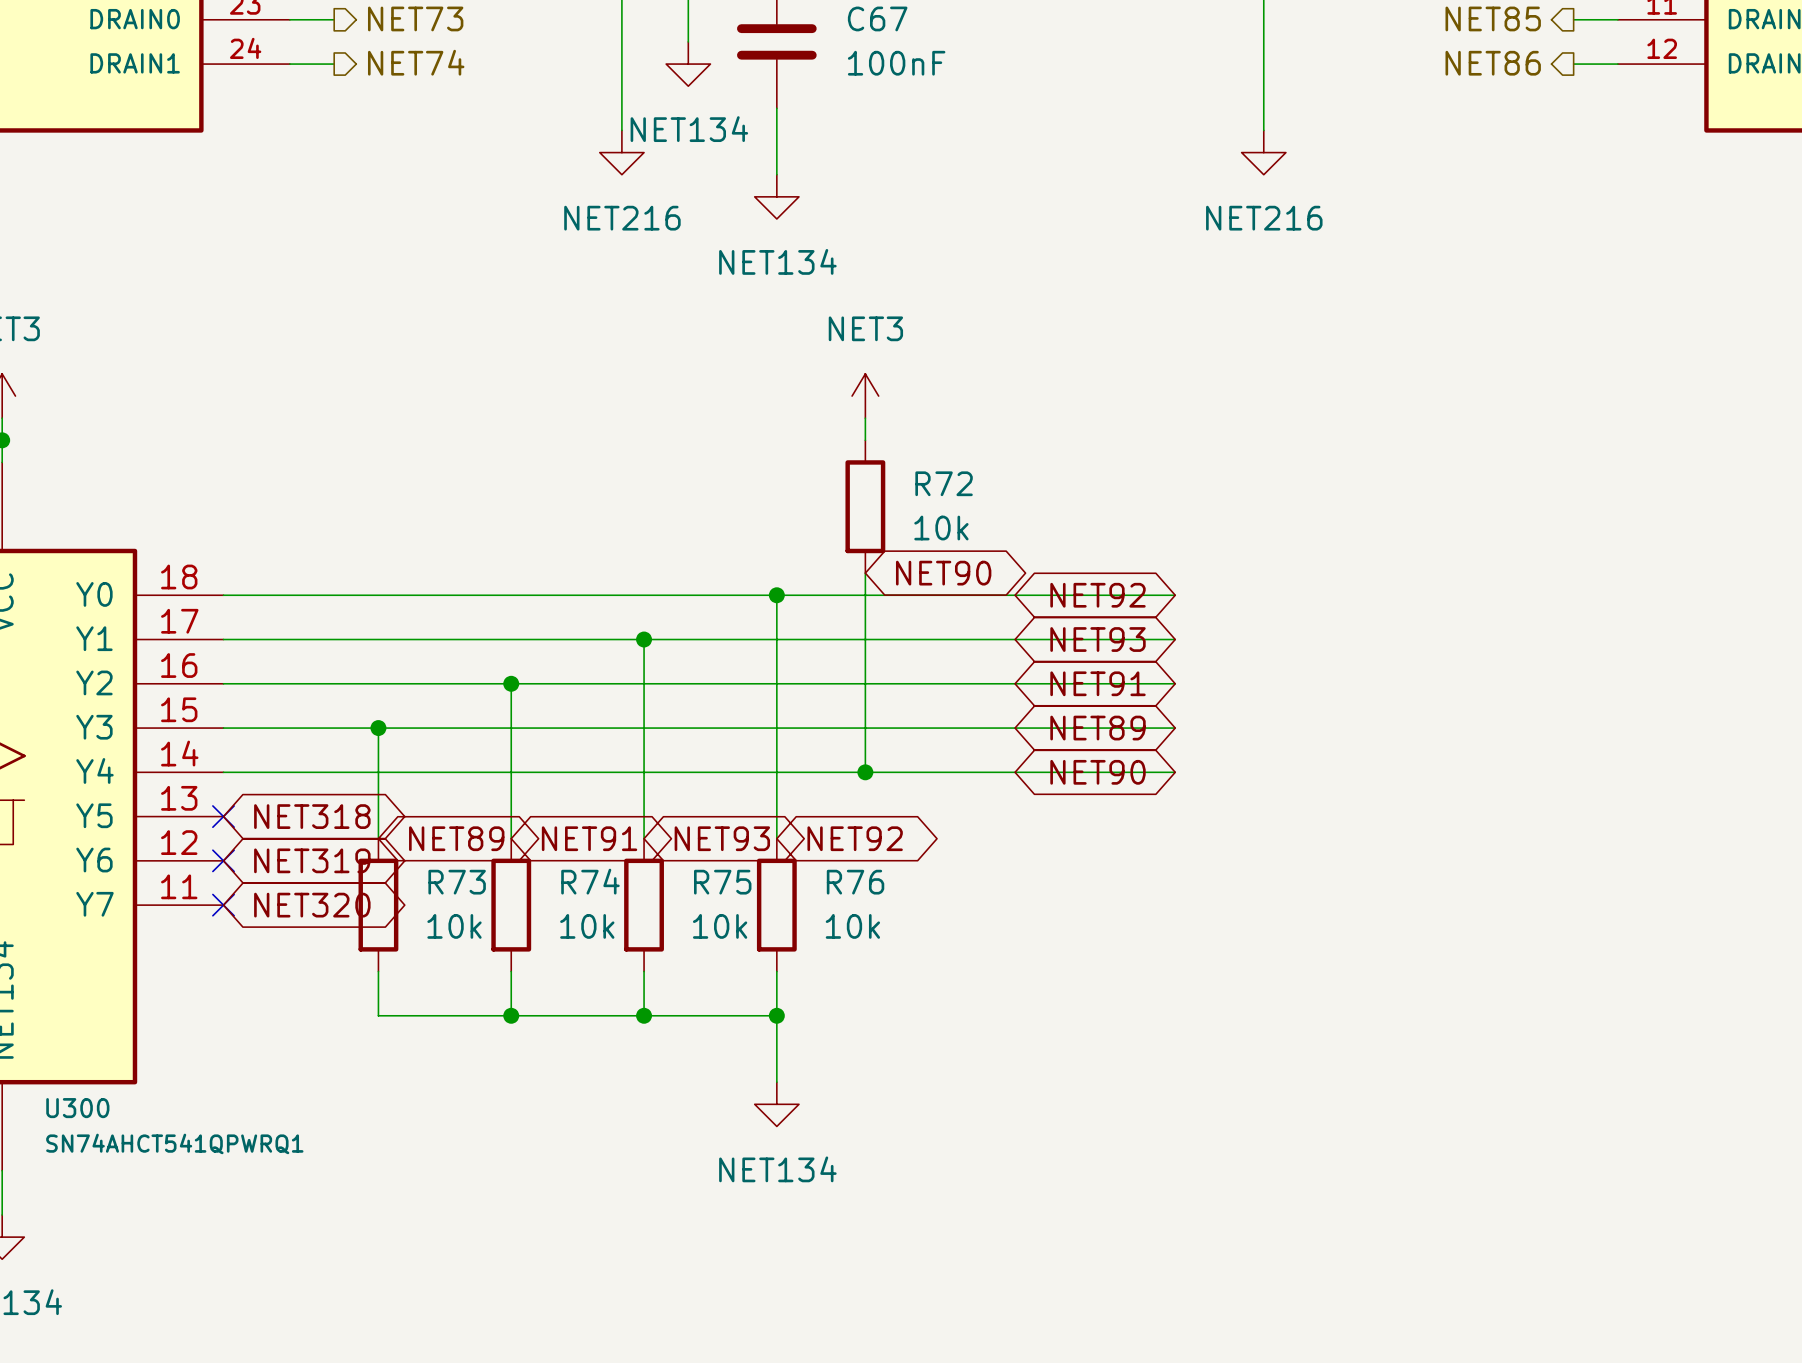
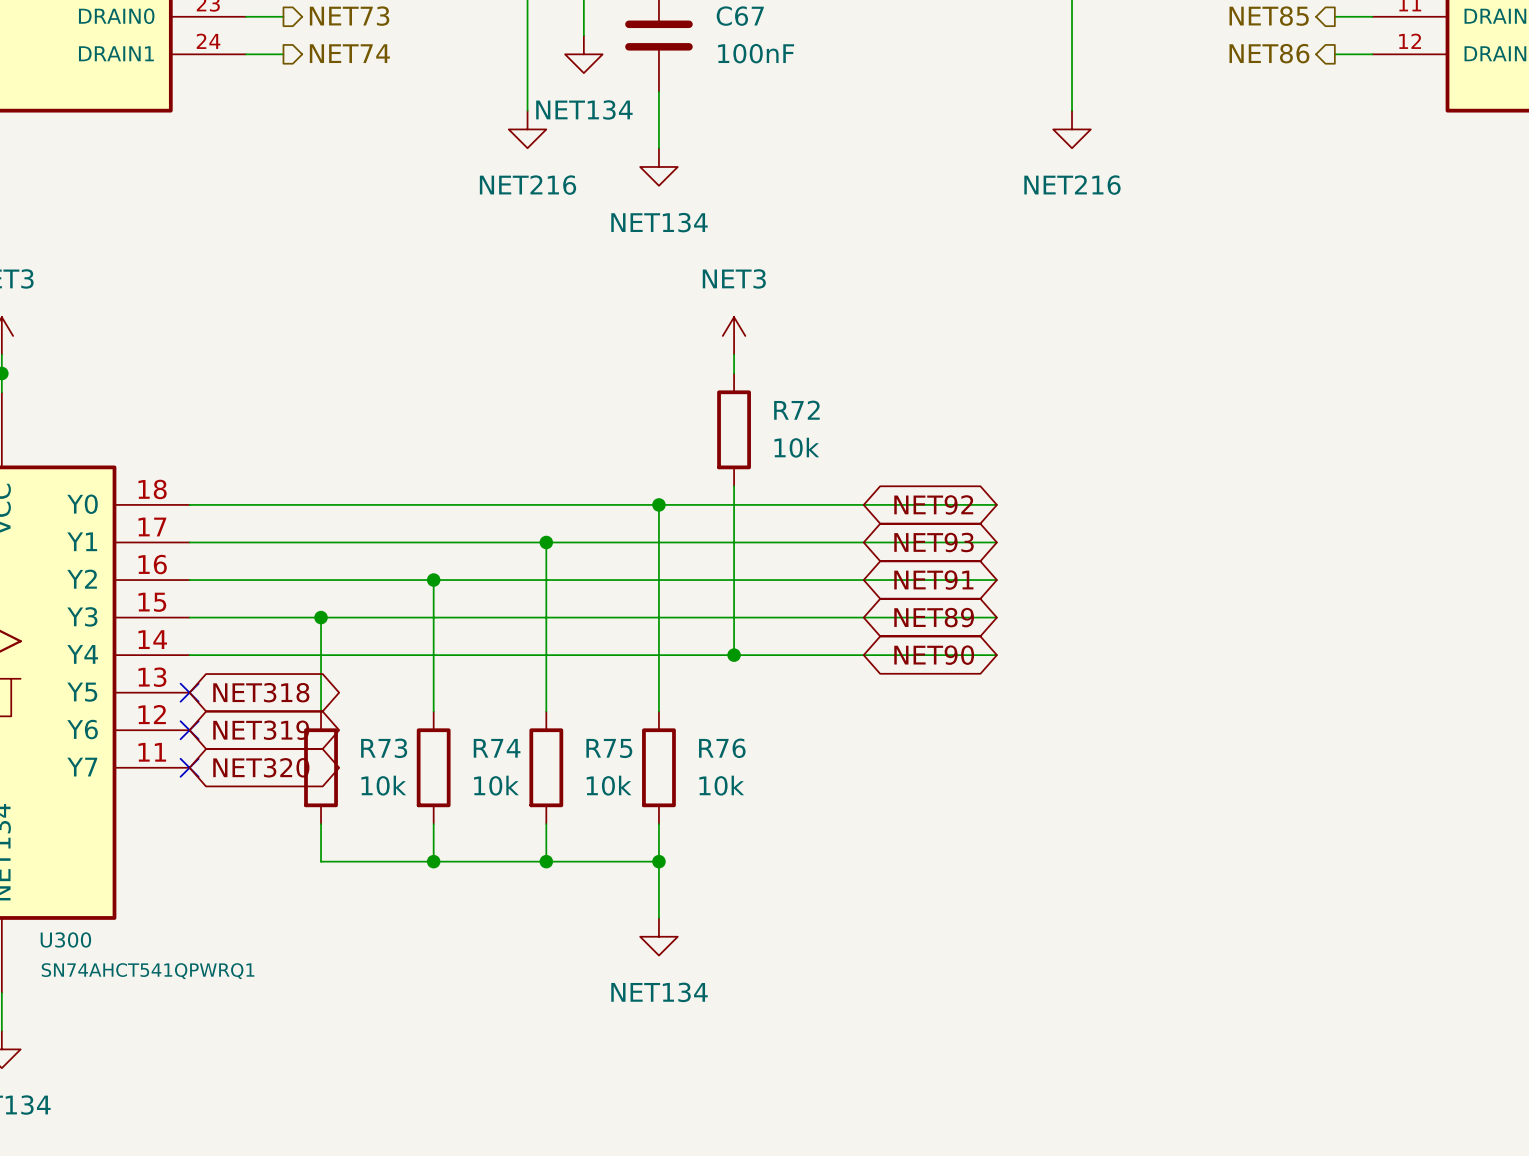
global label: NET90 (943, 573) -> none
global label: NET89 (456, 838) -> none
global label: NET91 (589, 838) -> none
global label: NET93 (722, 838) -> none
global label: NET92 (855, 838) -> none

